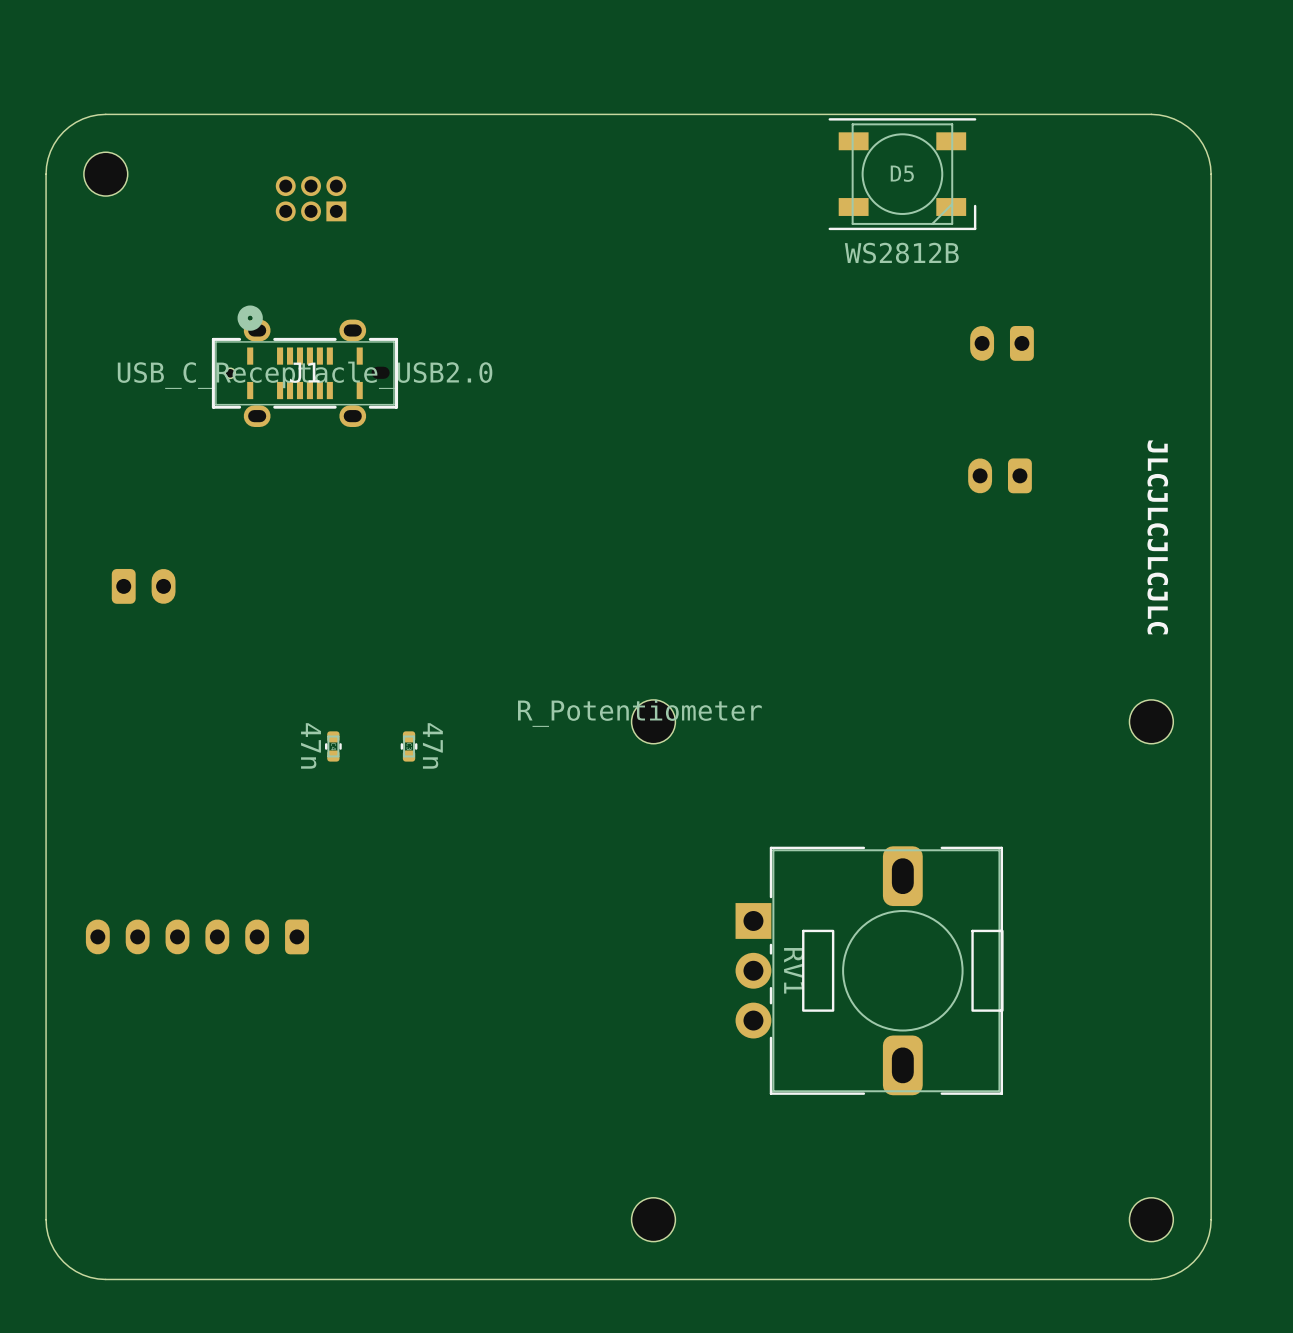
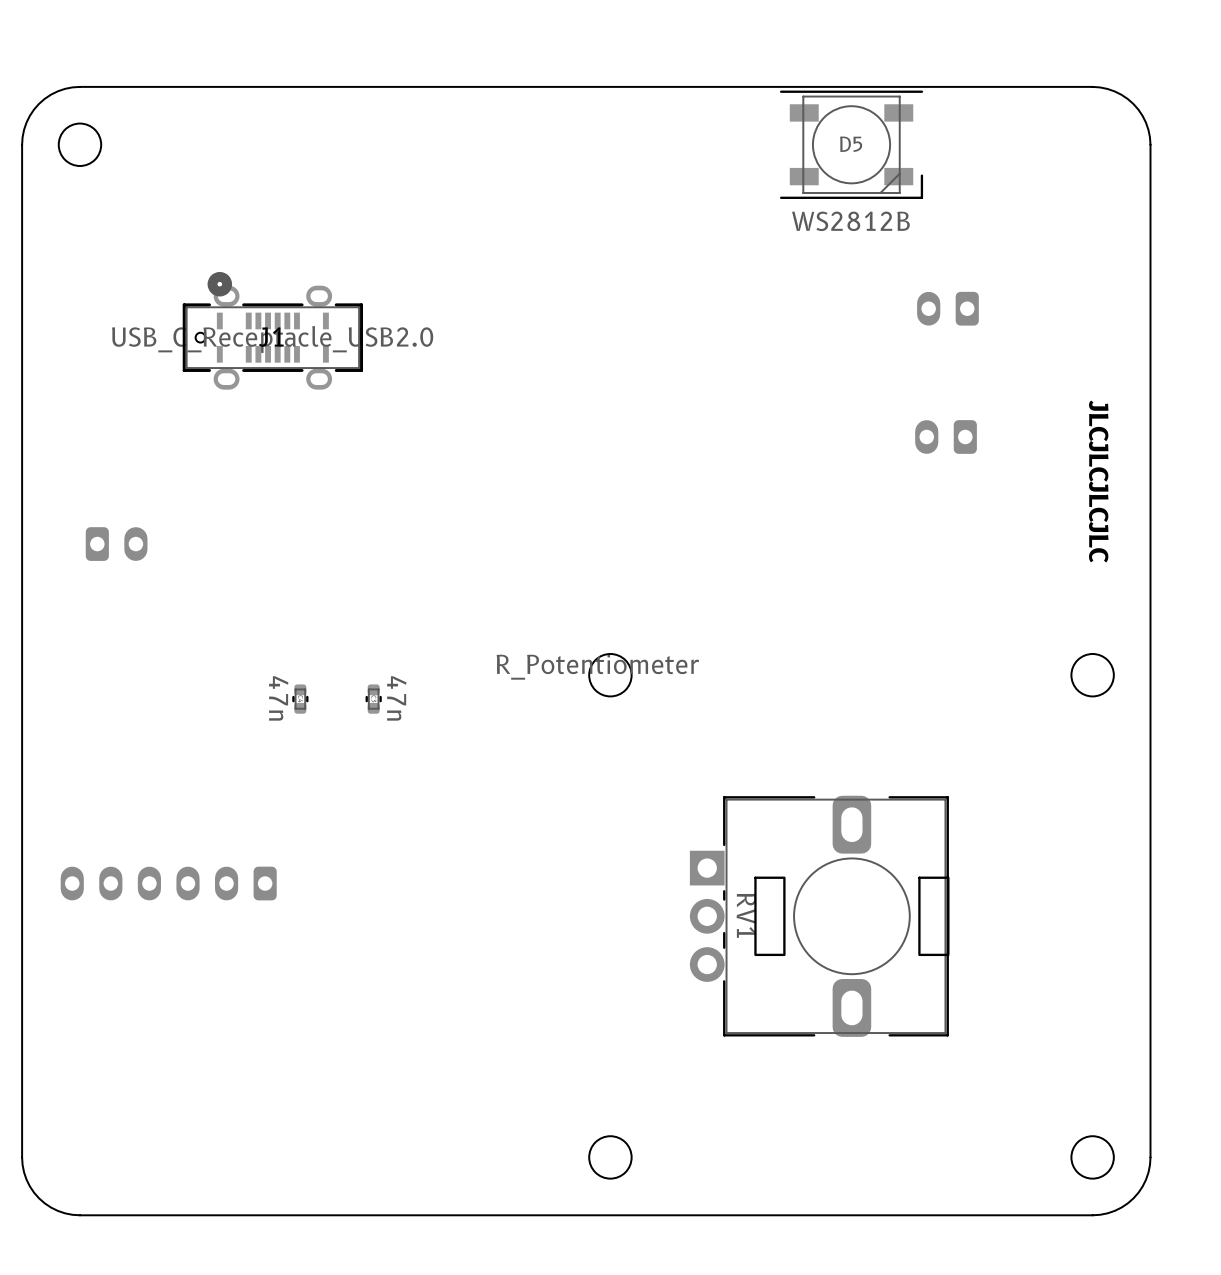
part: (311, 198) -> none

